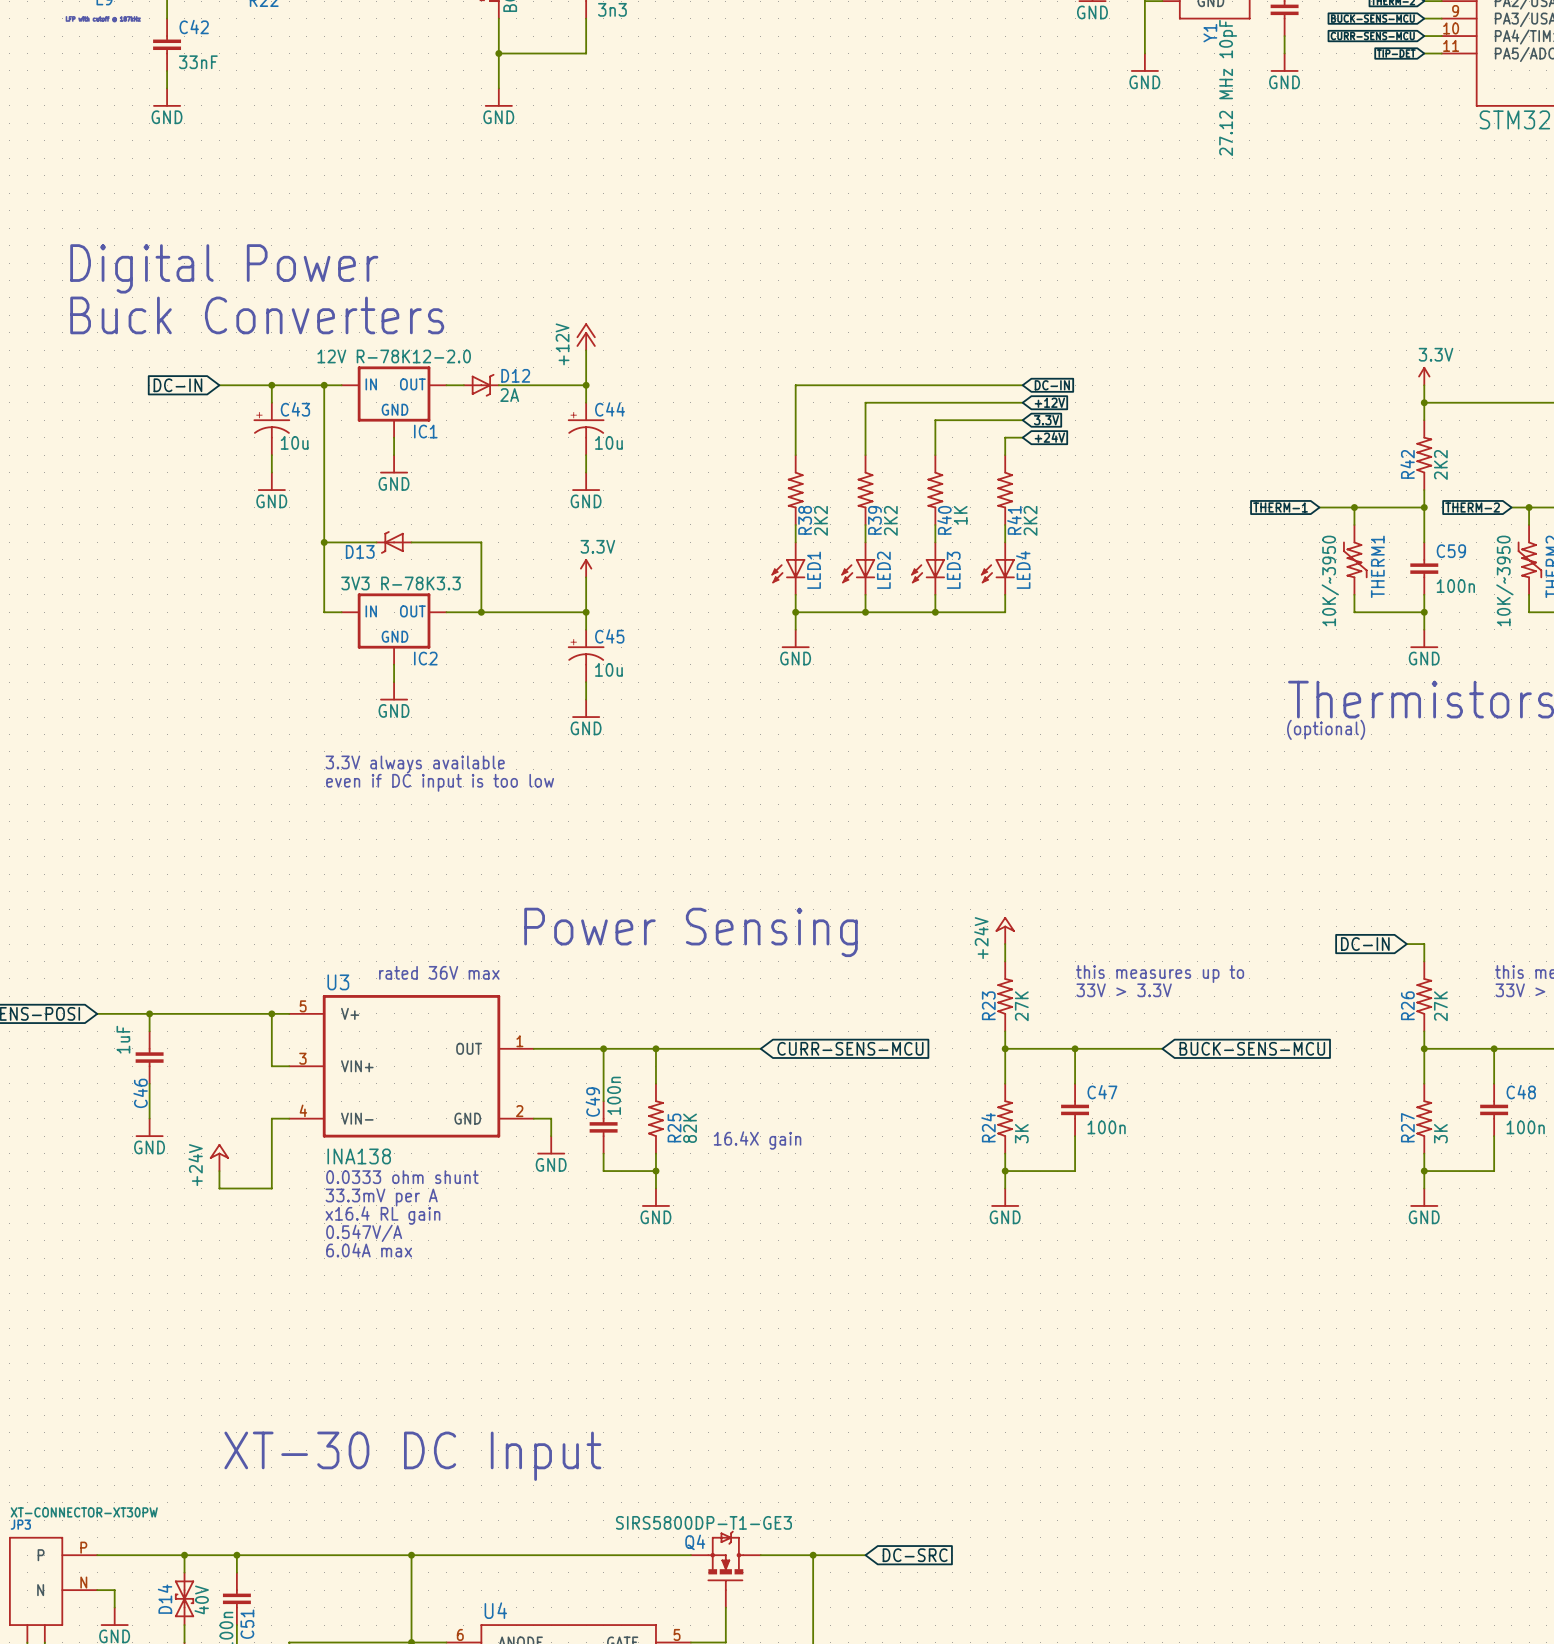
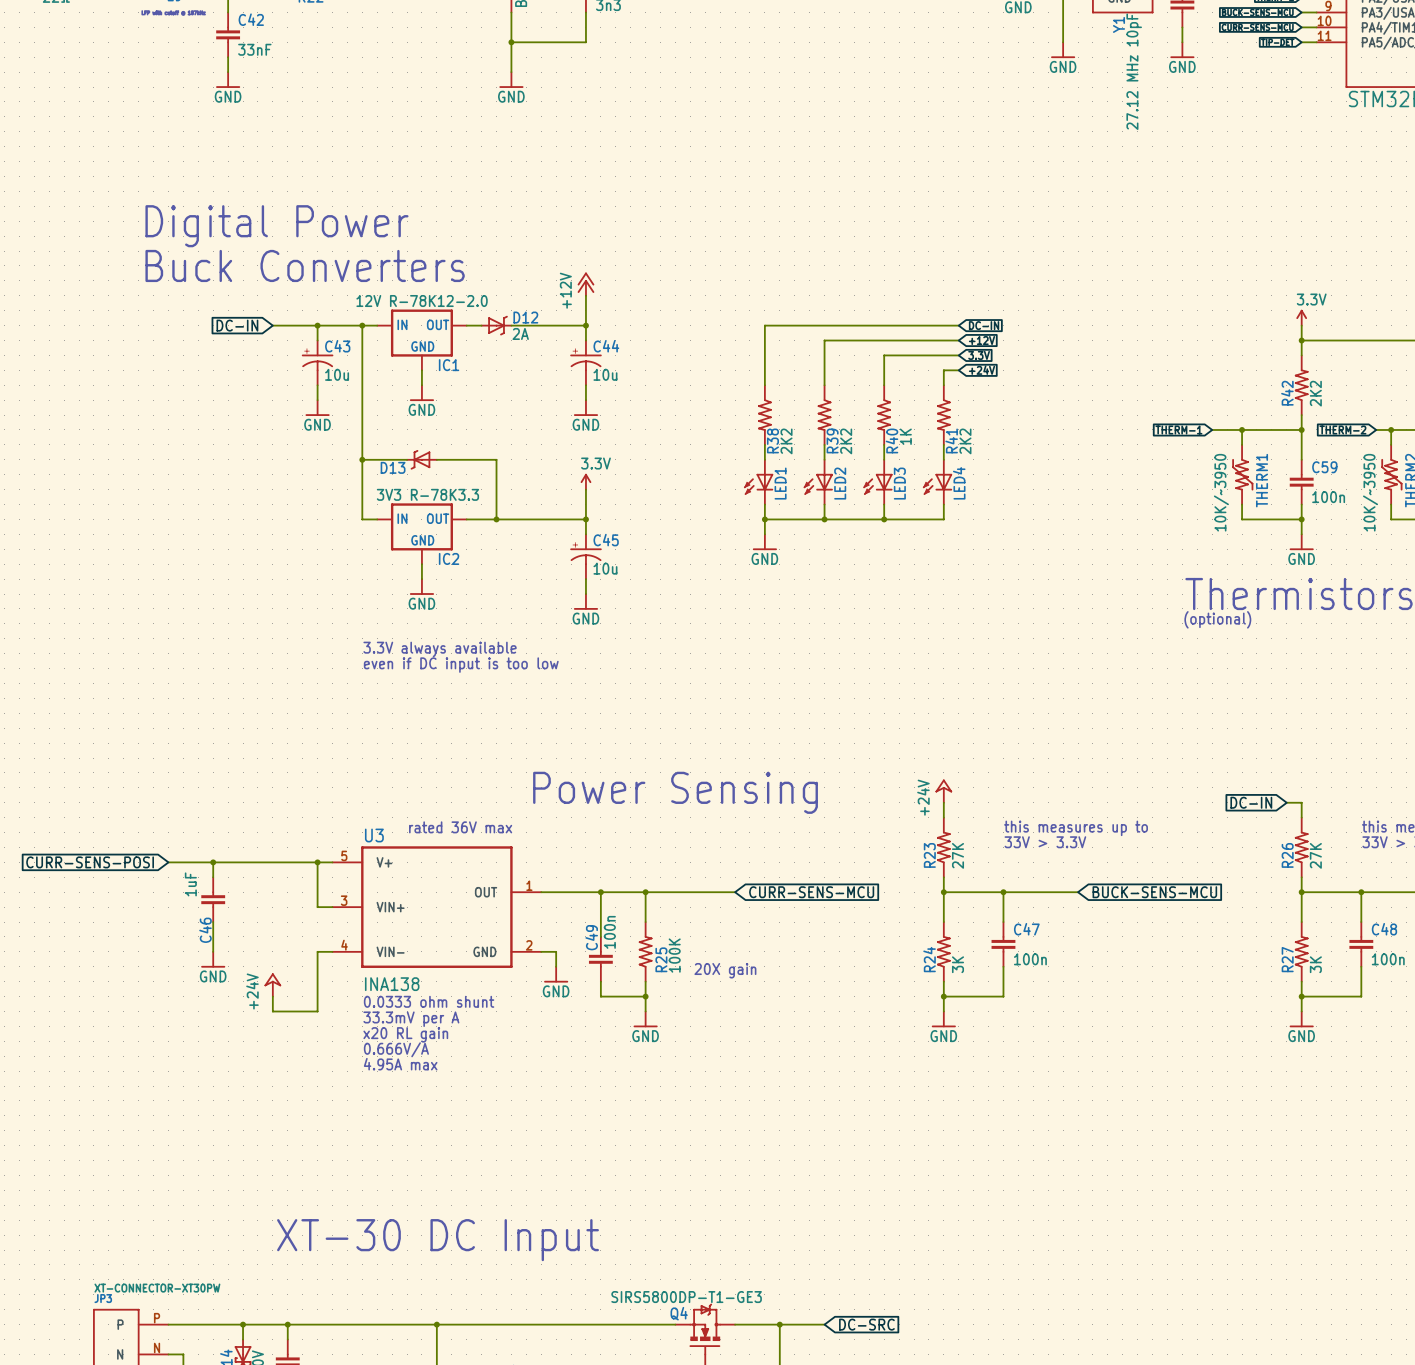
R25 value: 82K (690, 1128) -> 100K (674, 955)
text: 16.4X gain (757, 1140) -> 20X gain (725, 970)
text: x16.4 RL gain (383, 1215) -> x20 RL gain (405, 1034)
text: 0.547V/A (364, 1233) -> 0.666V/A (396, 1049)
text: 6.04A max (369, 1250) -> 4.95A max (400, 1064)

